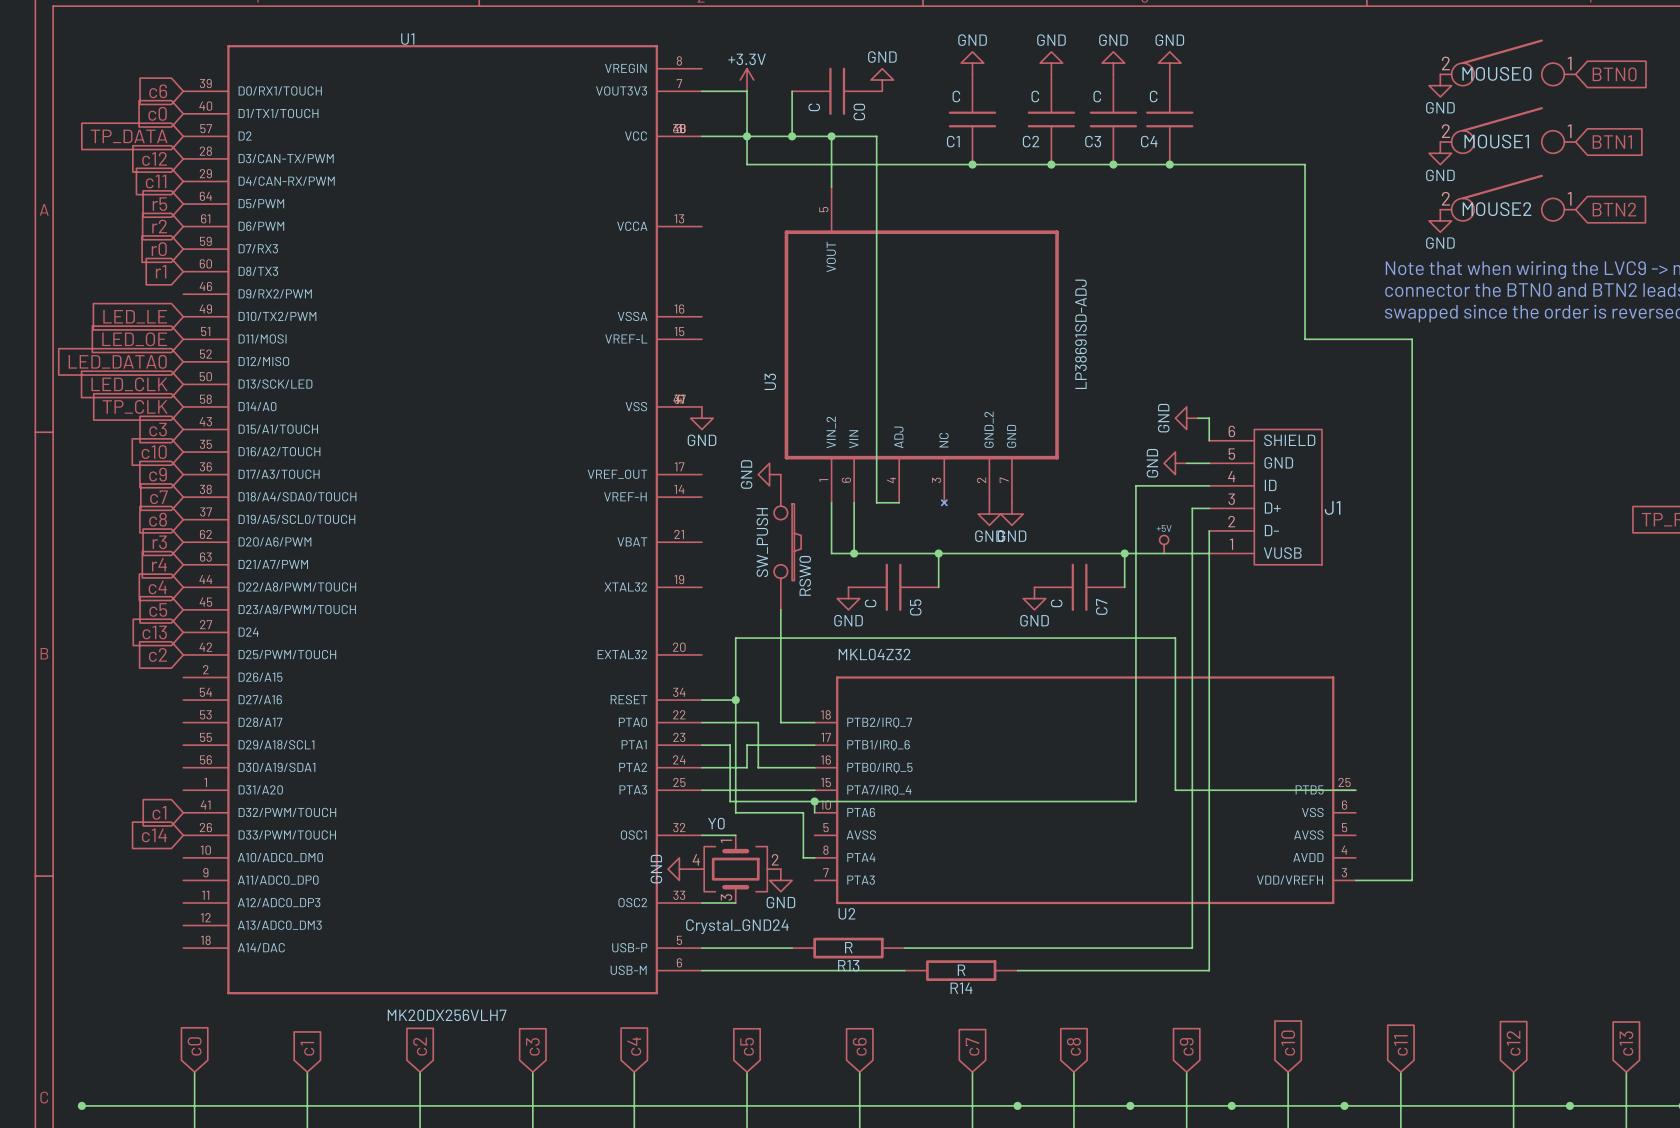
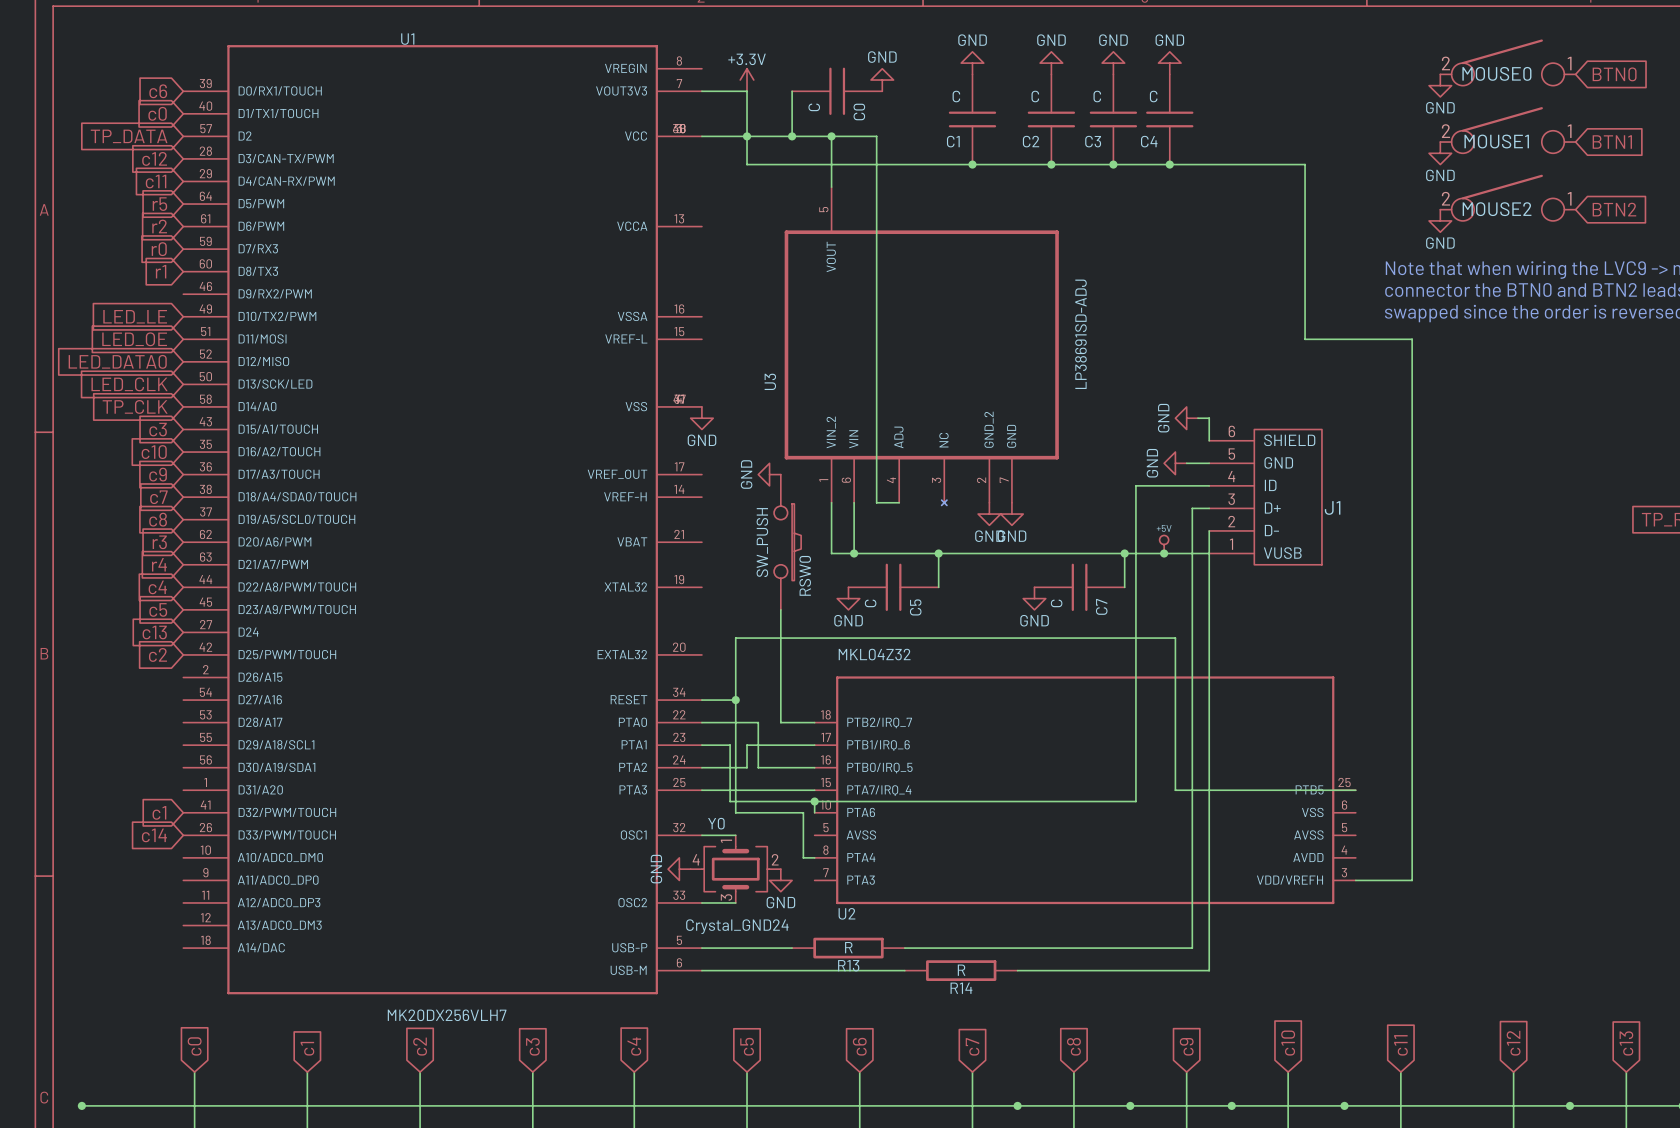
junction: none -> (1164, 553)

